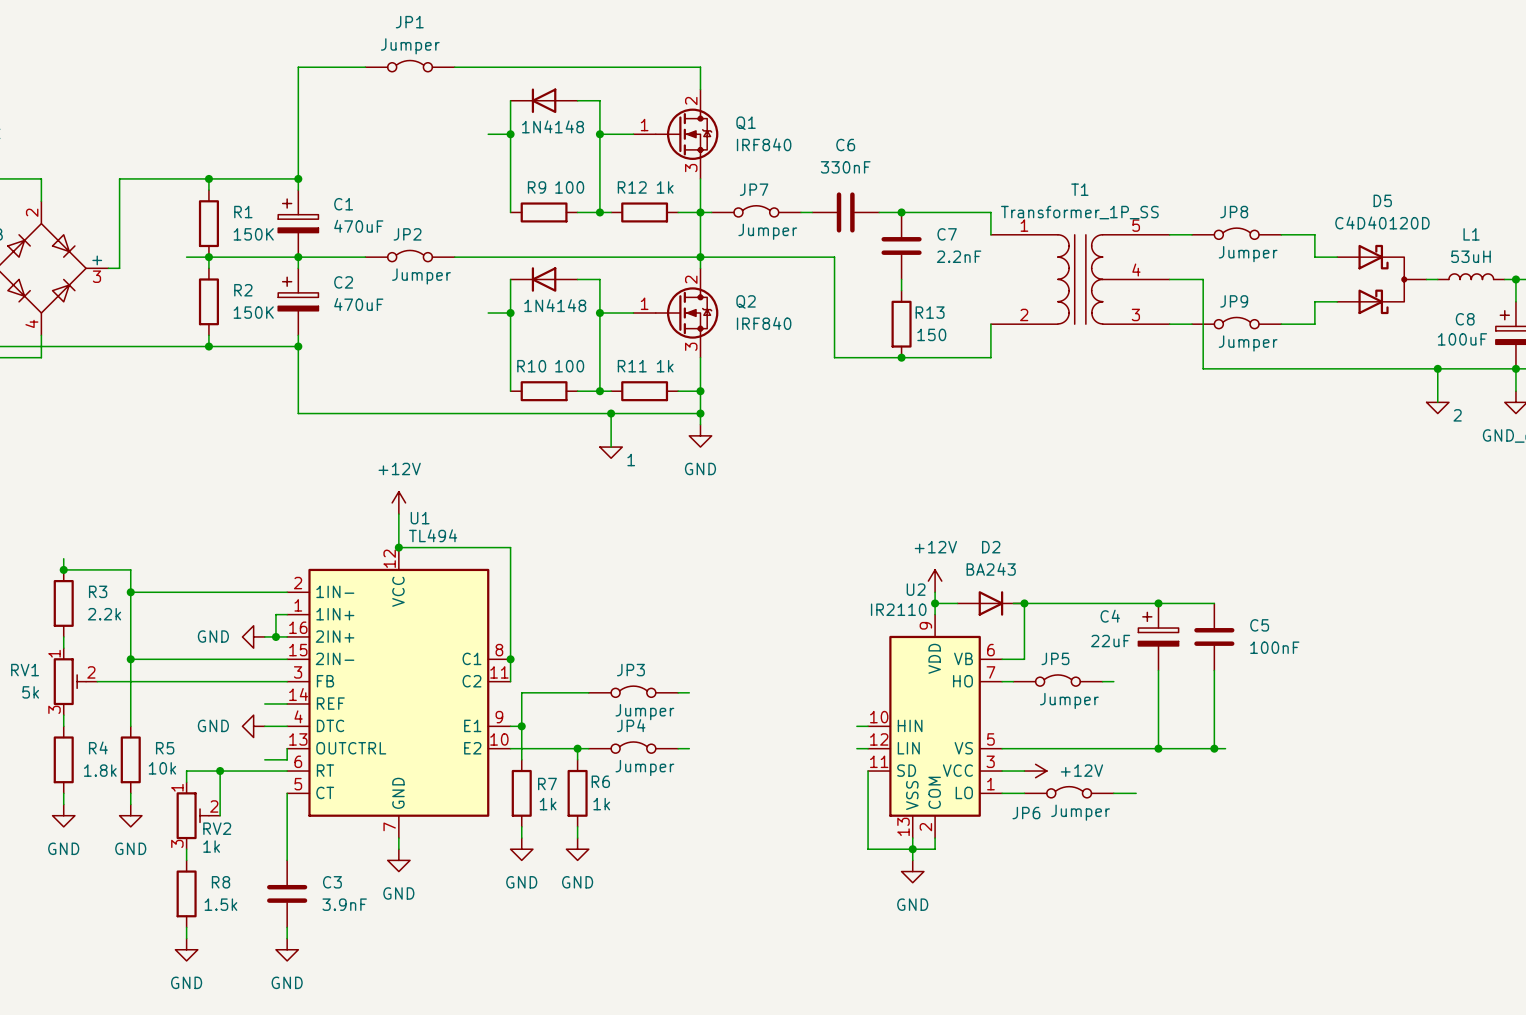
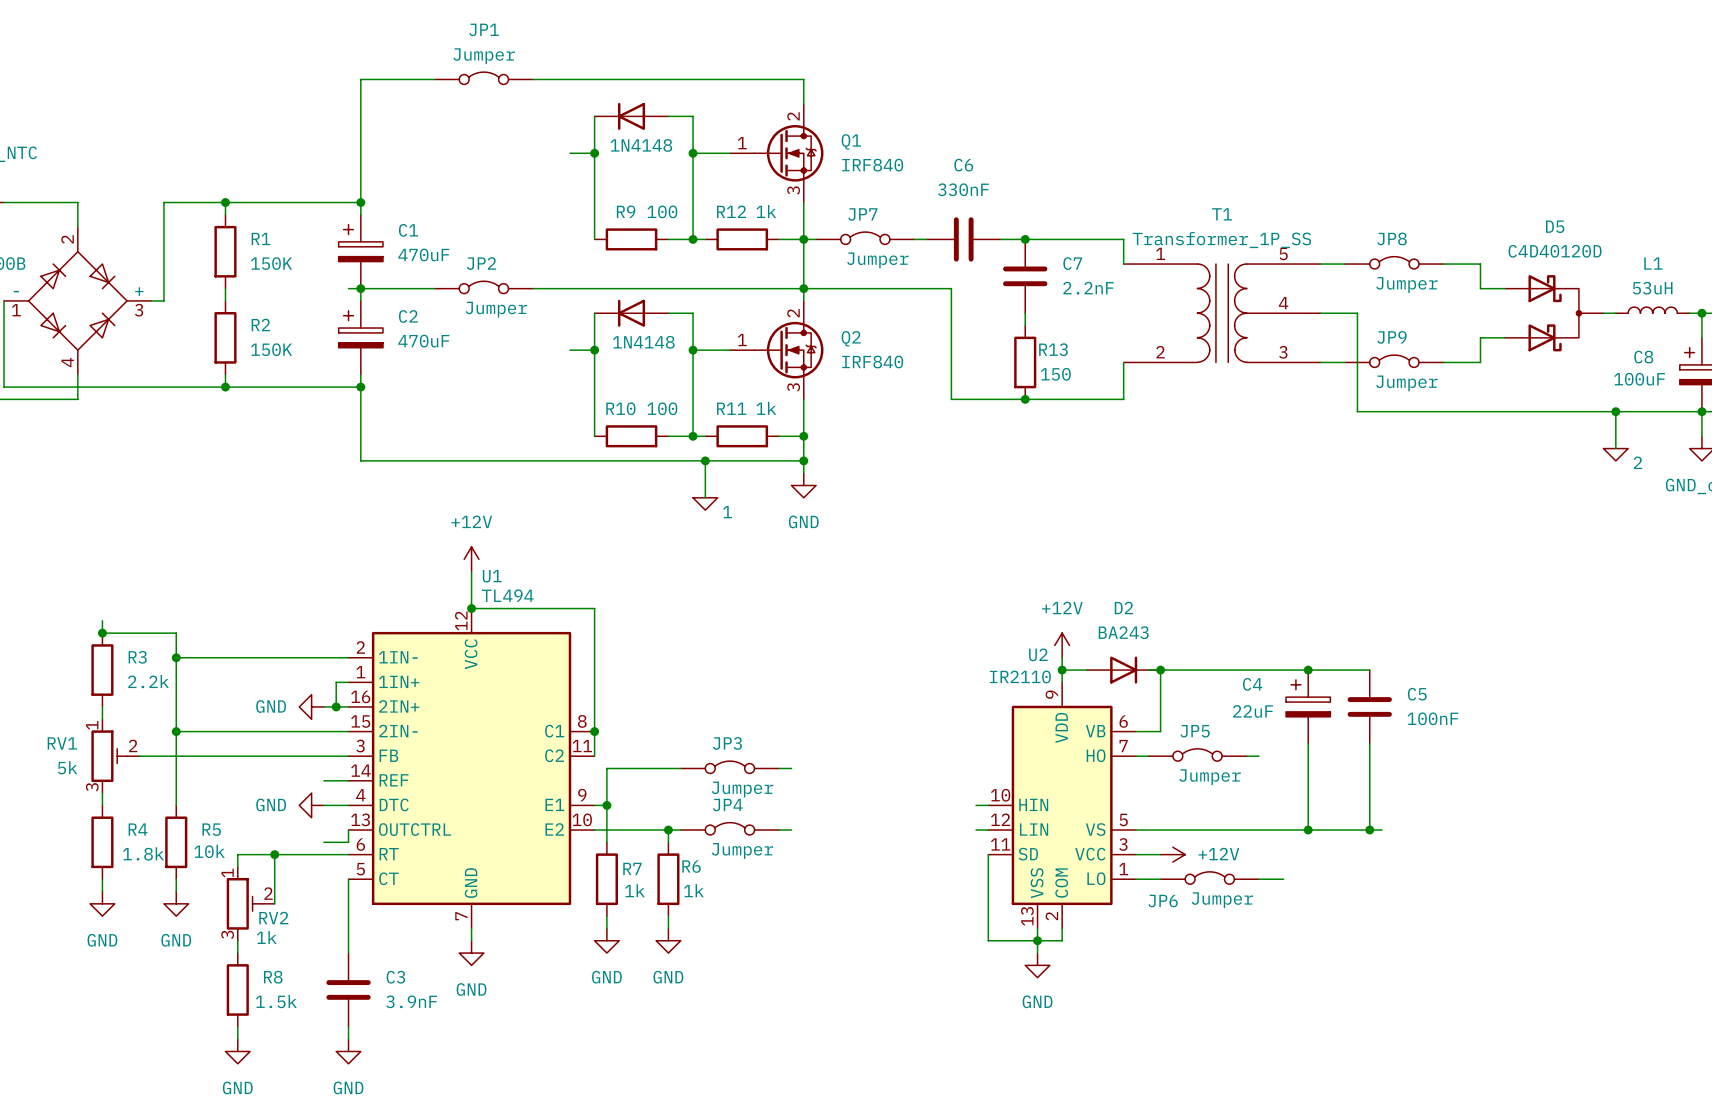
wire: (208, 178) (208, 190) -> (225, 202) (225, 214)
junction position: (208, 178) -> (225, 202)
R1 position: (208, 223) -> (225, 251)
wire: (186, 257) (287, 257) -> none
wire: (208, 257) (208, 268) -> (225, 288) (225, 300)
junction: (208, 257) -> none
R2 position: (208, 301) -> (225, 337)
wire: (208, 335) (208, 346) -> (225, 374) (225, 387)
junction position: (208, 346) -> (225, 387)

